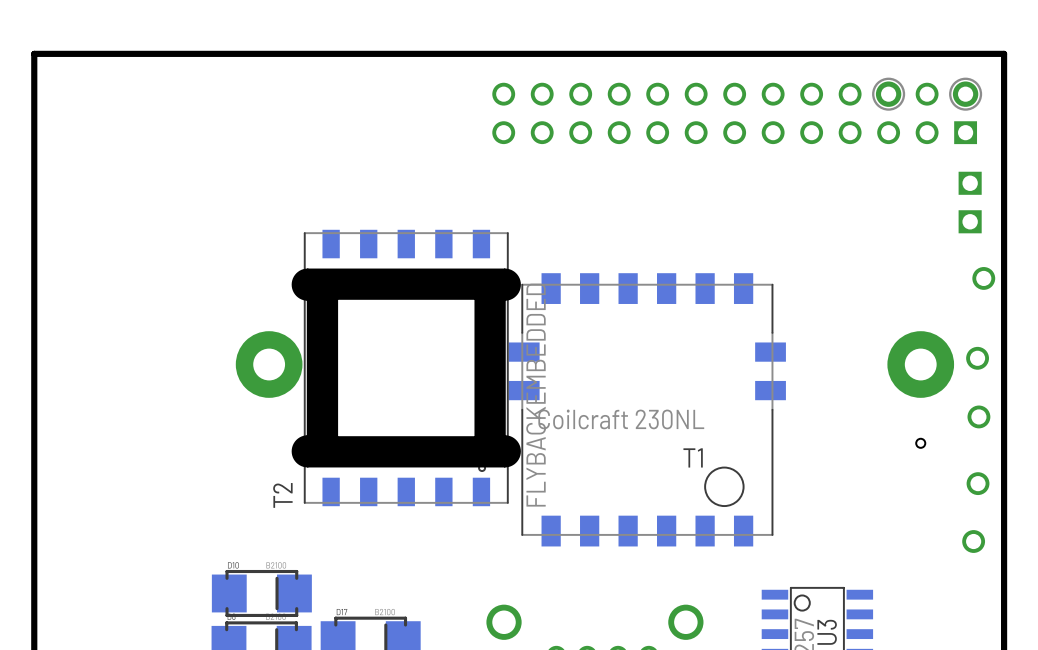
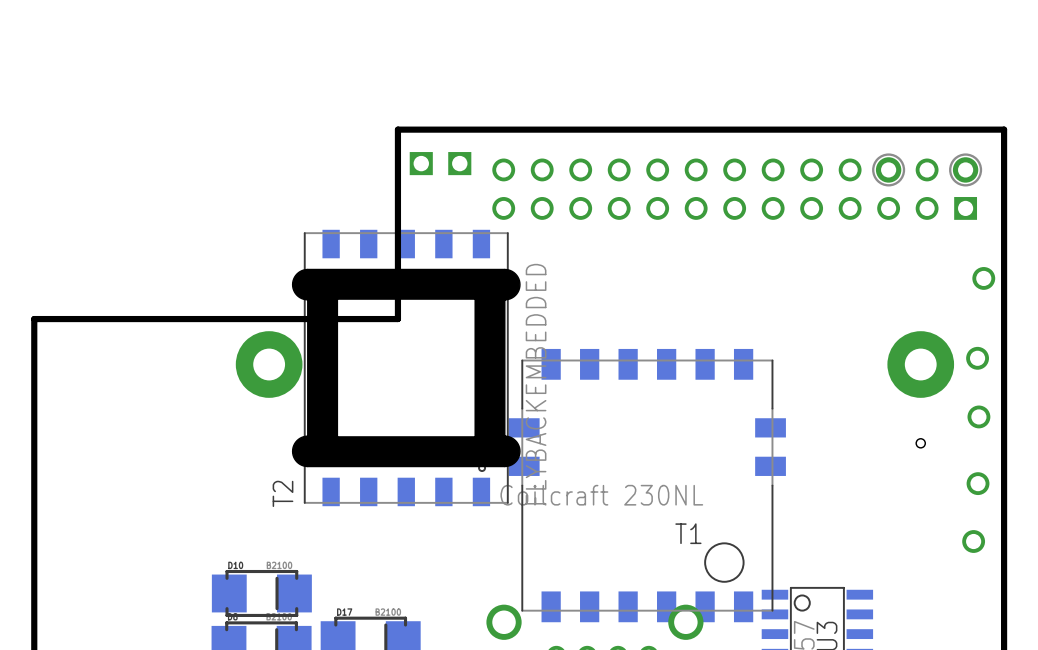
part position: (737, 110) -> (737, 186)
board edge: (1004, 129) (1004, 53) (34, 53) (34, 319) -> (1004, 129) (397, 129) (397, 319) (34, 319)
part: none -> (440, 163)
part: (970, 202) -> none
T1 position: (647, 409) -> (647, 485)

